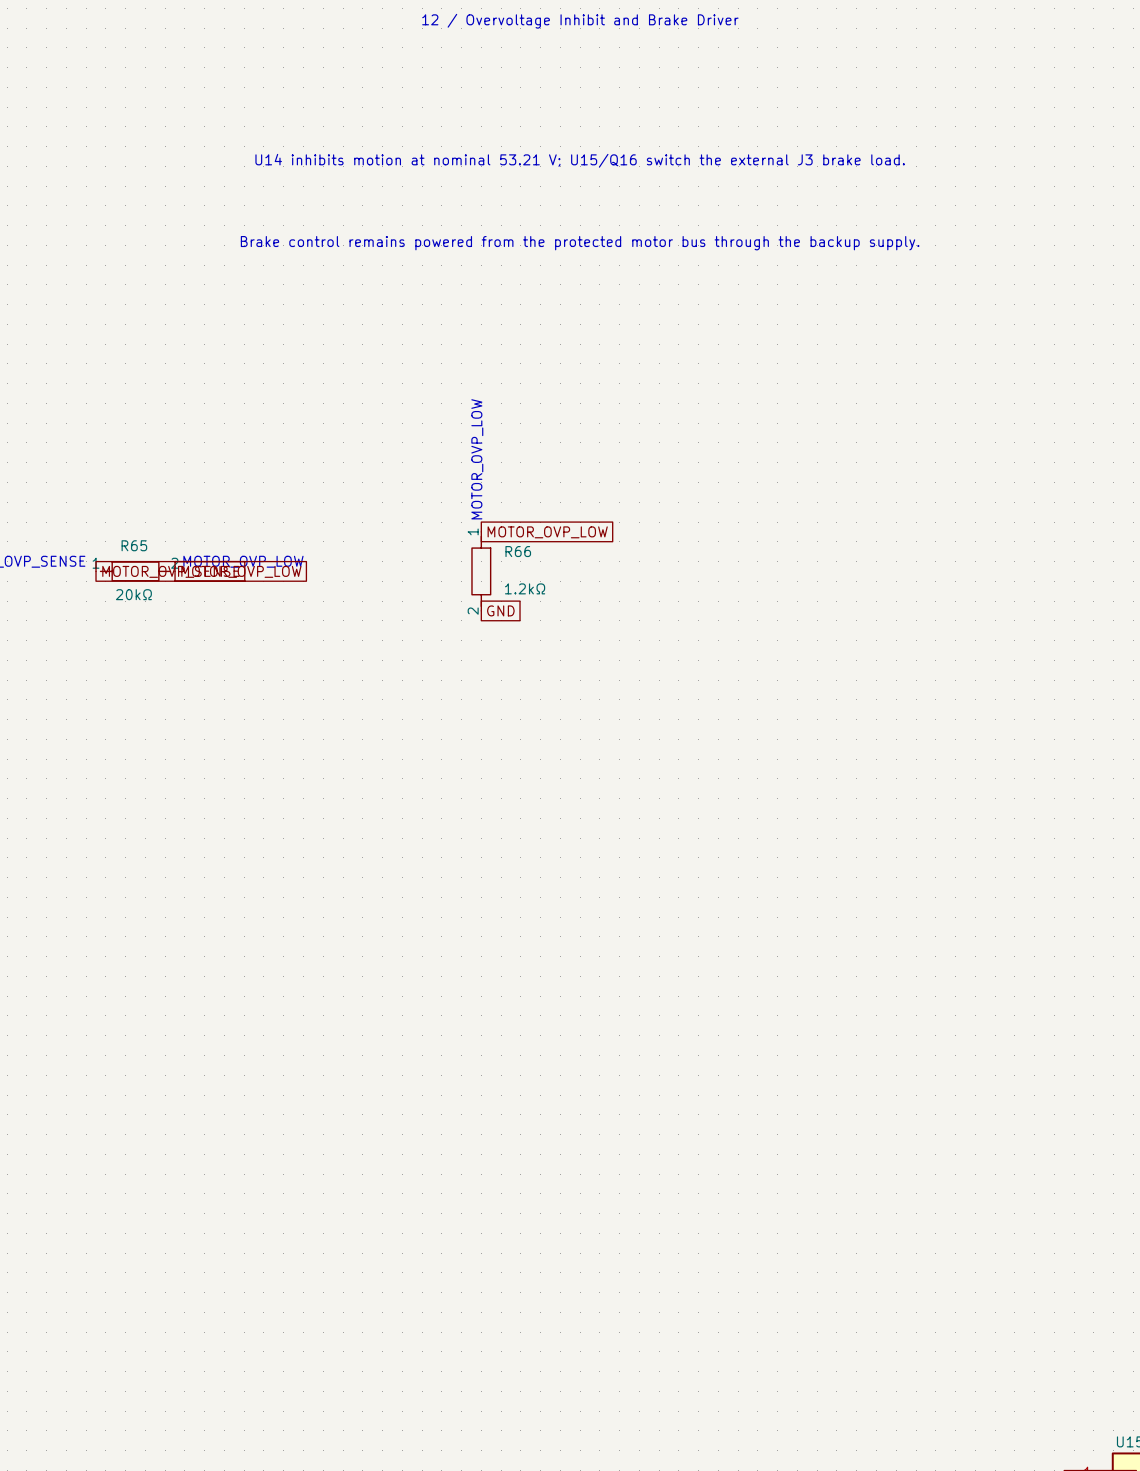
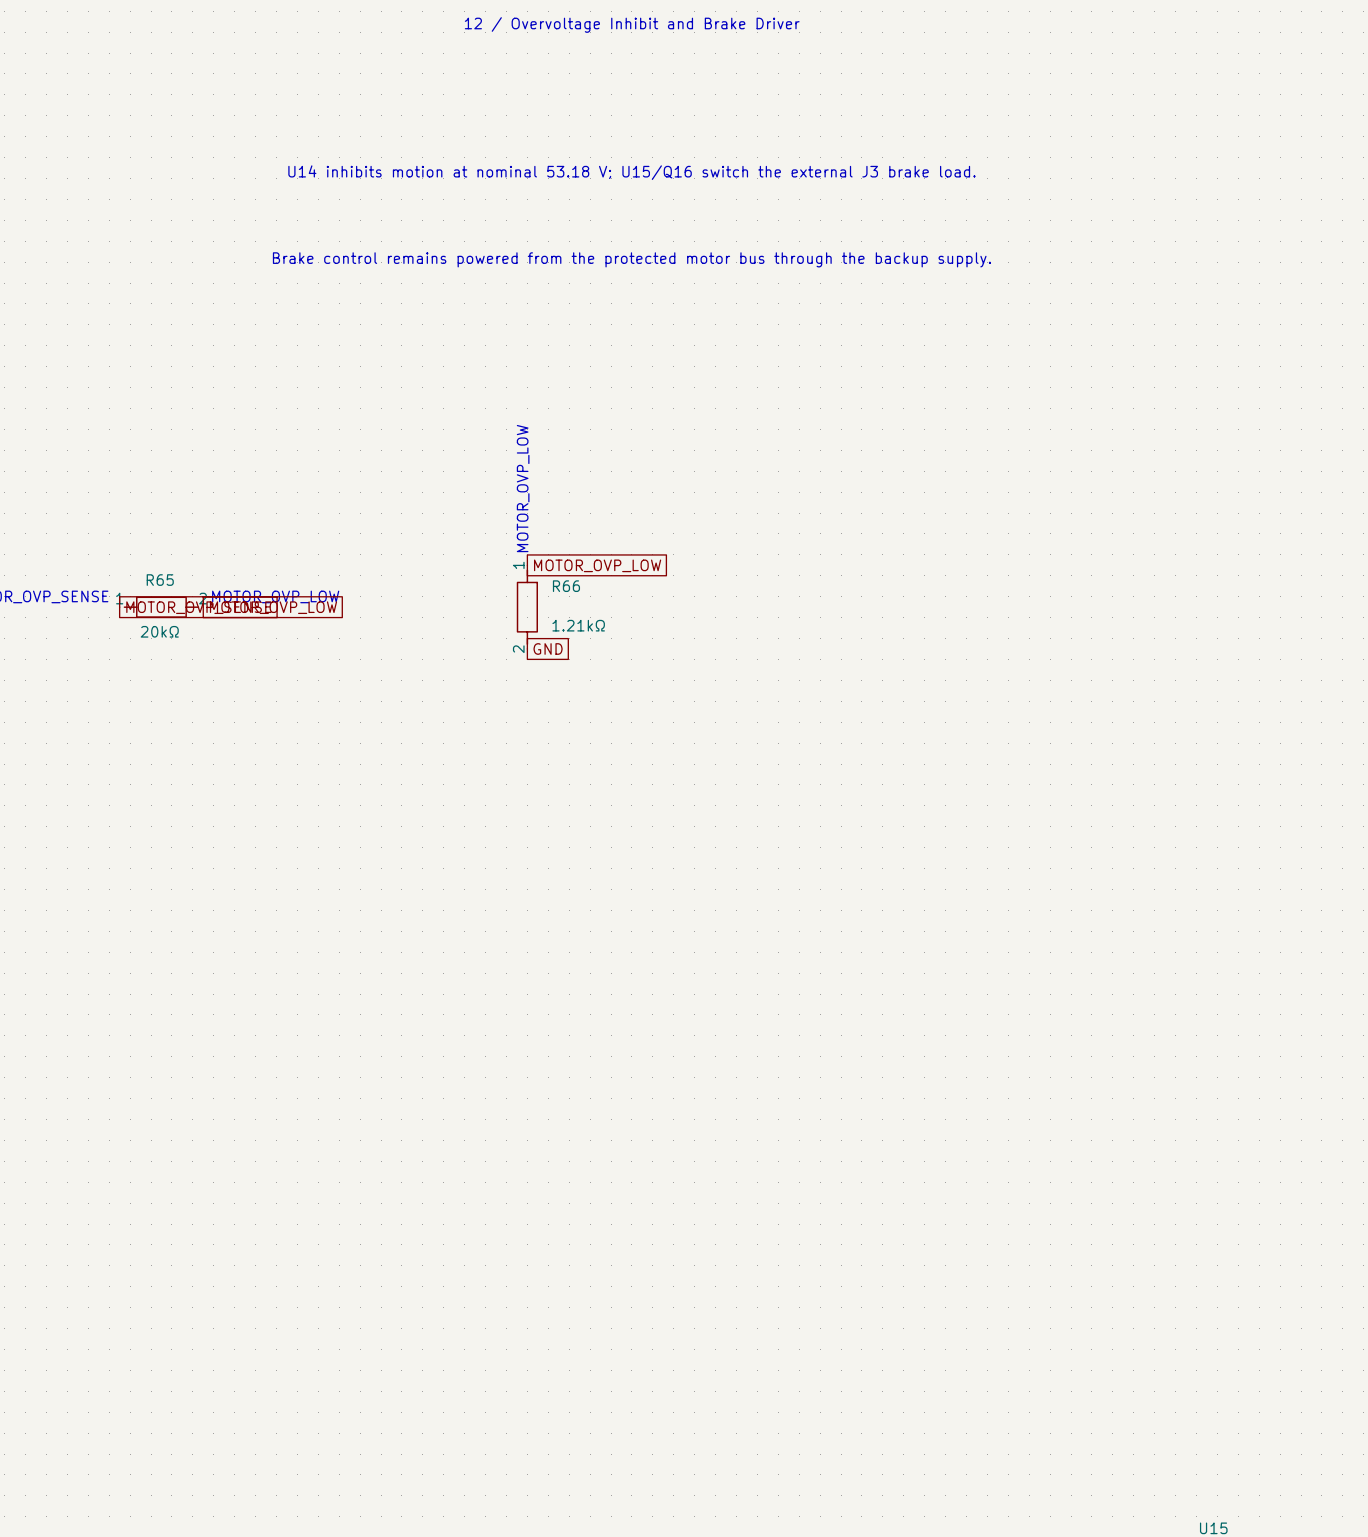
text: U14 inhibits motion at nominal 53.21 V; U15/Q16 switch the external J3 brake load. (580, 160) -> U14 inhibits motion at nominal 53.18 V; U15/Q16 switch the external J3 brake load. (631, 172)
R66 value: 1.2kΩ (525, 588) -> 1.21kΩ (578, 625)

